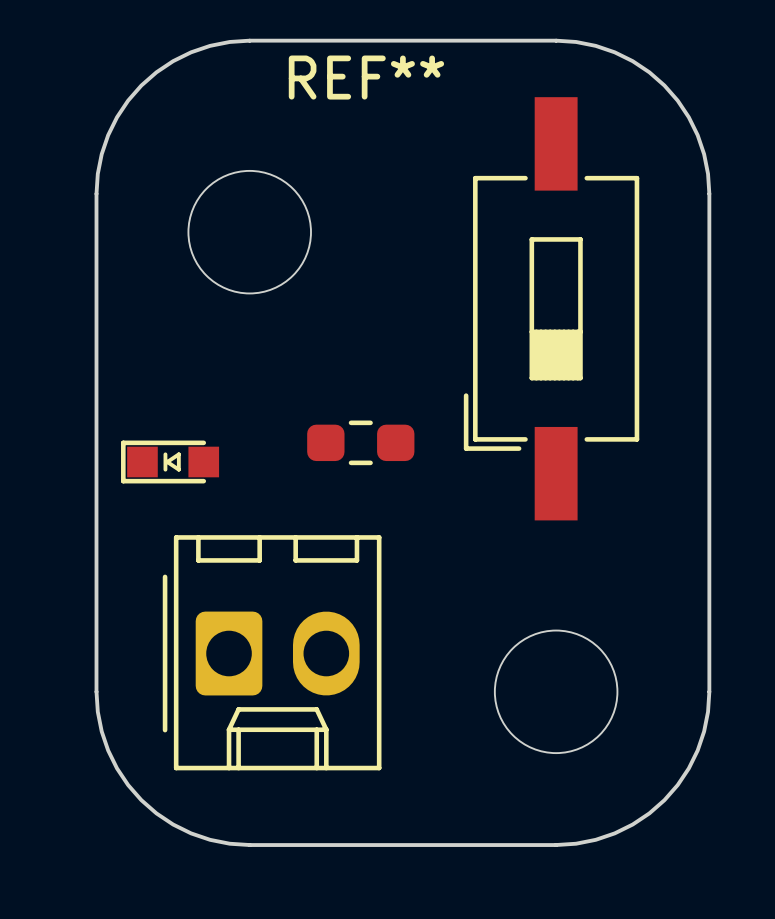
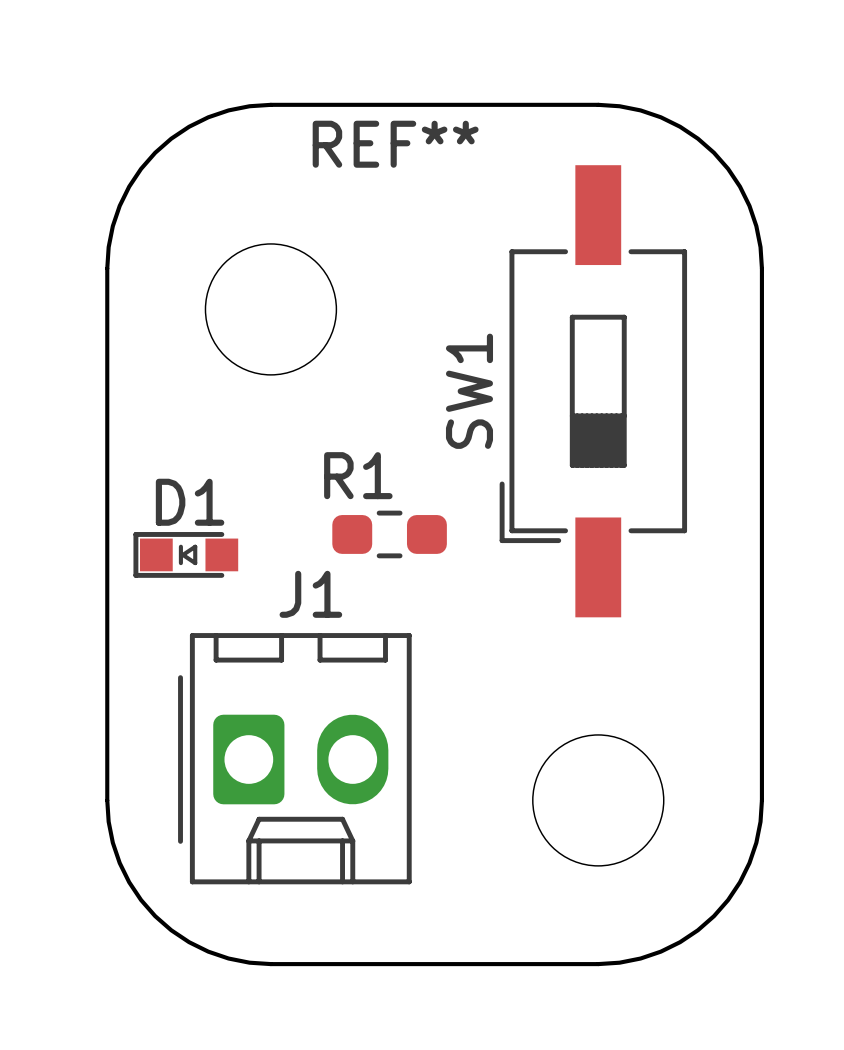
SW1 name: none -> SW1 (469, 391)
R1 name: none -> R1 (358, 475)
D1 name: none -> D1 (190, 502)
J1 name: none -> J1 (310, 594)

